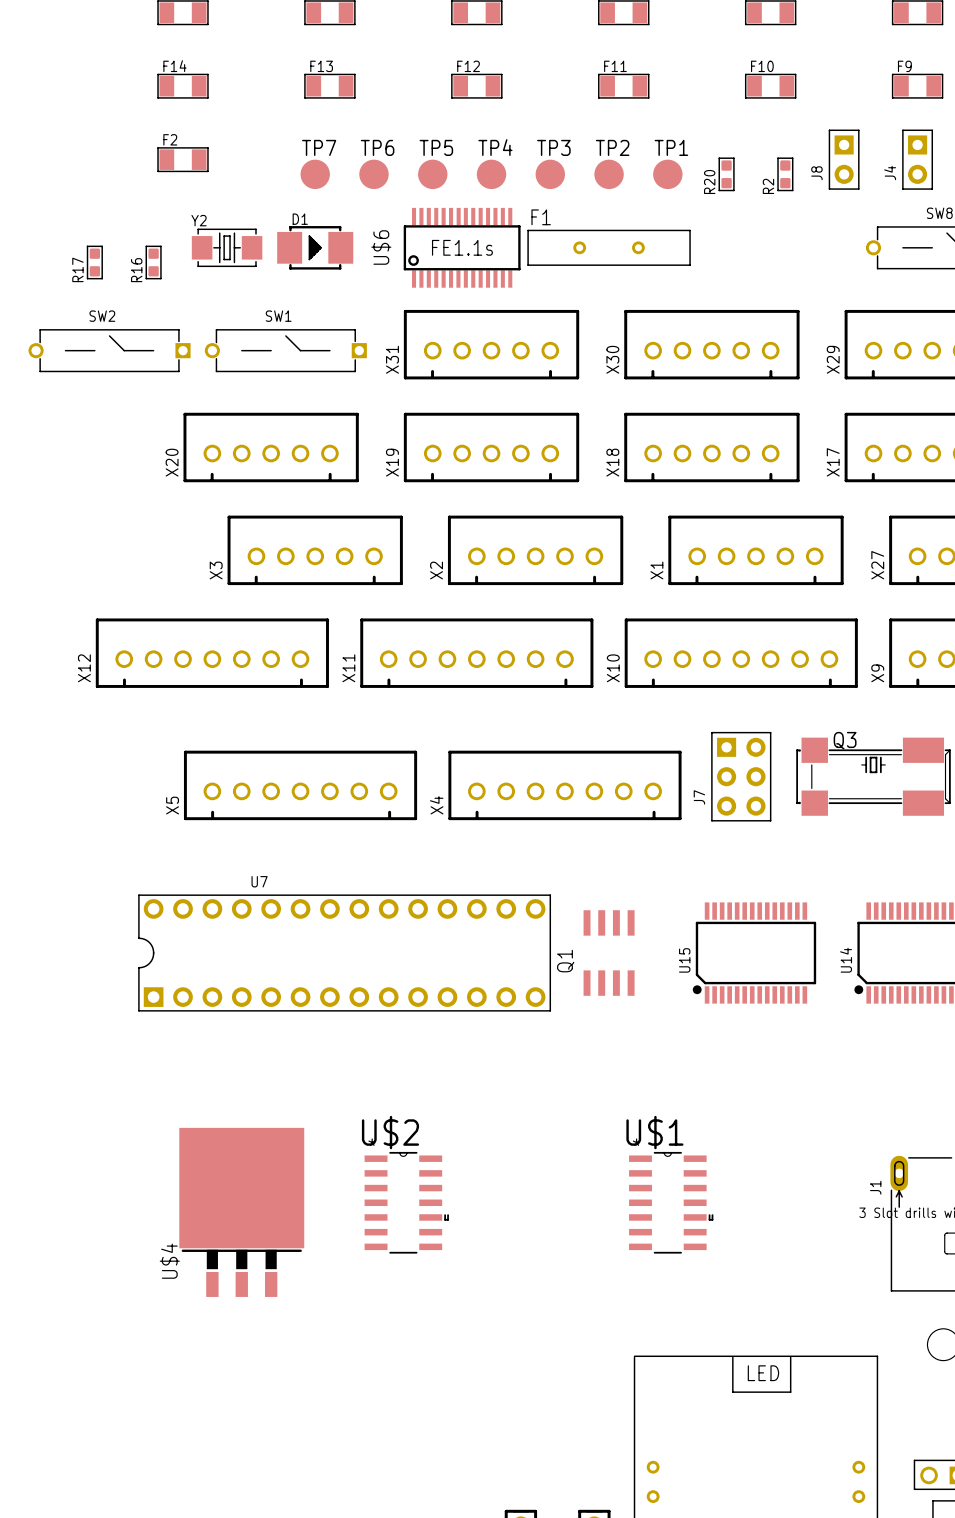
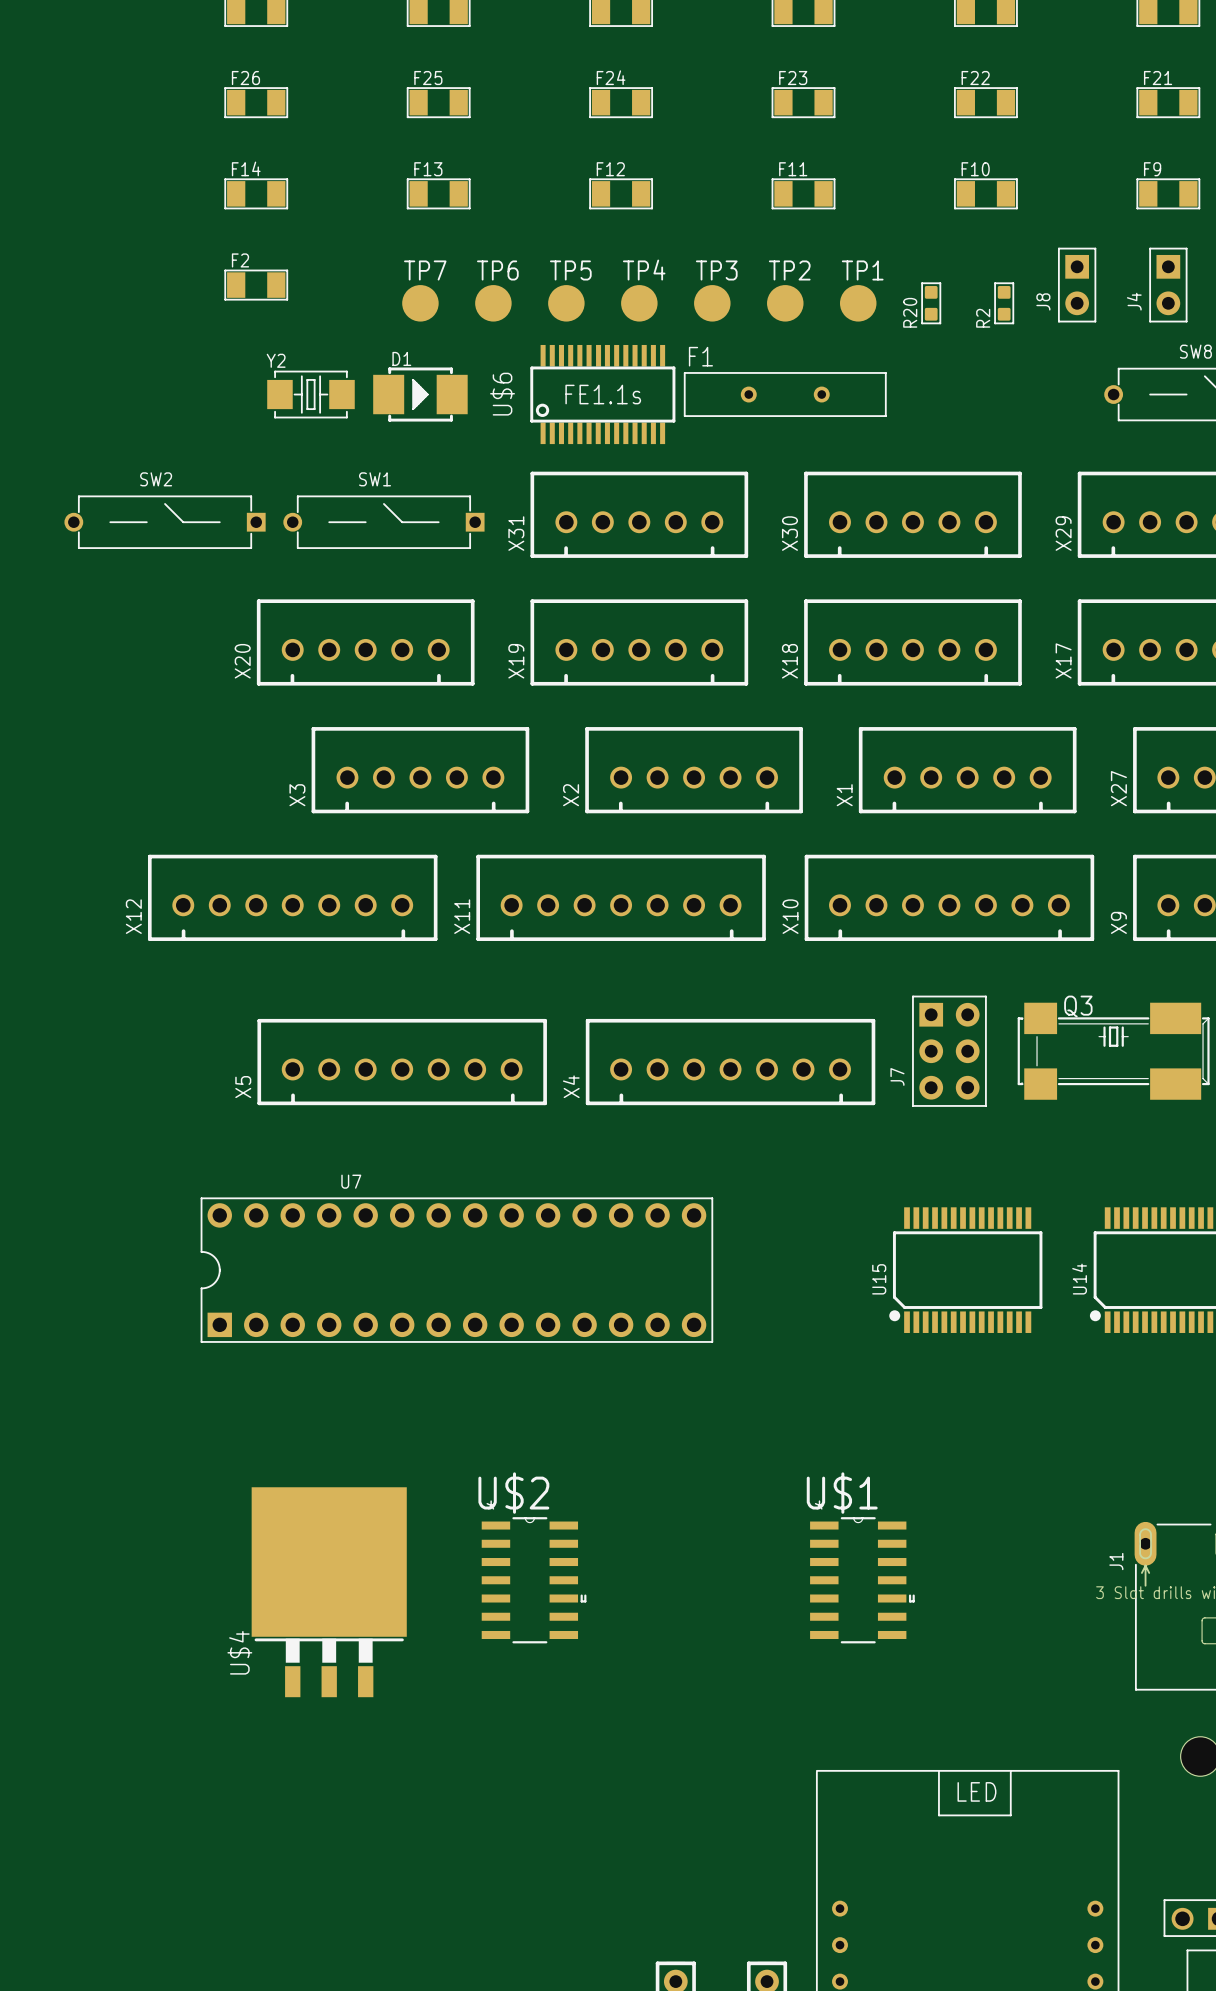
R17: (94, 262) -> none
R16: (153, 262) -> none
Q1: (609, 953) -> none

